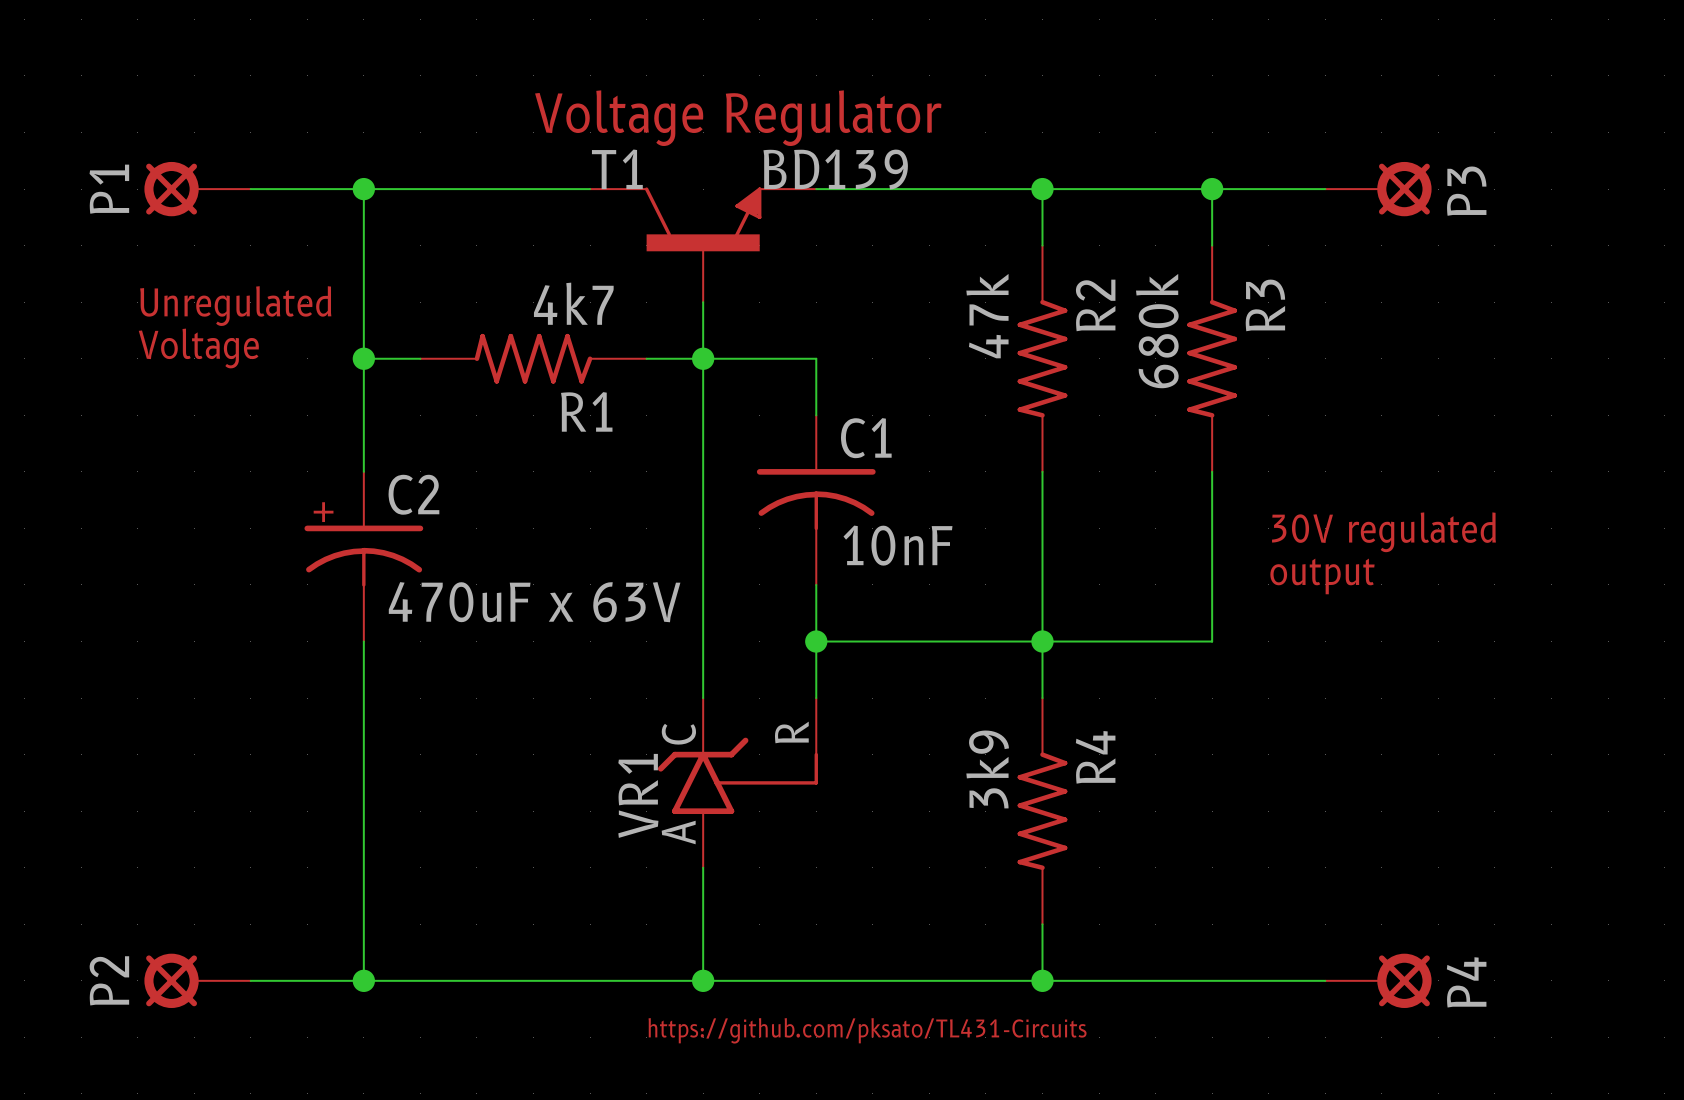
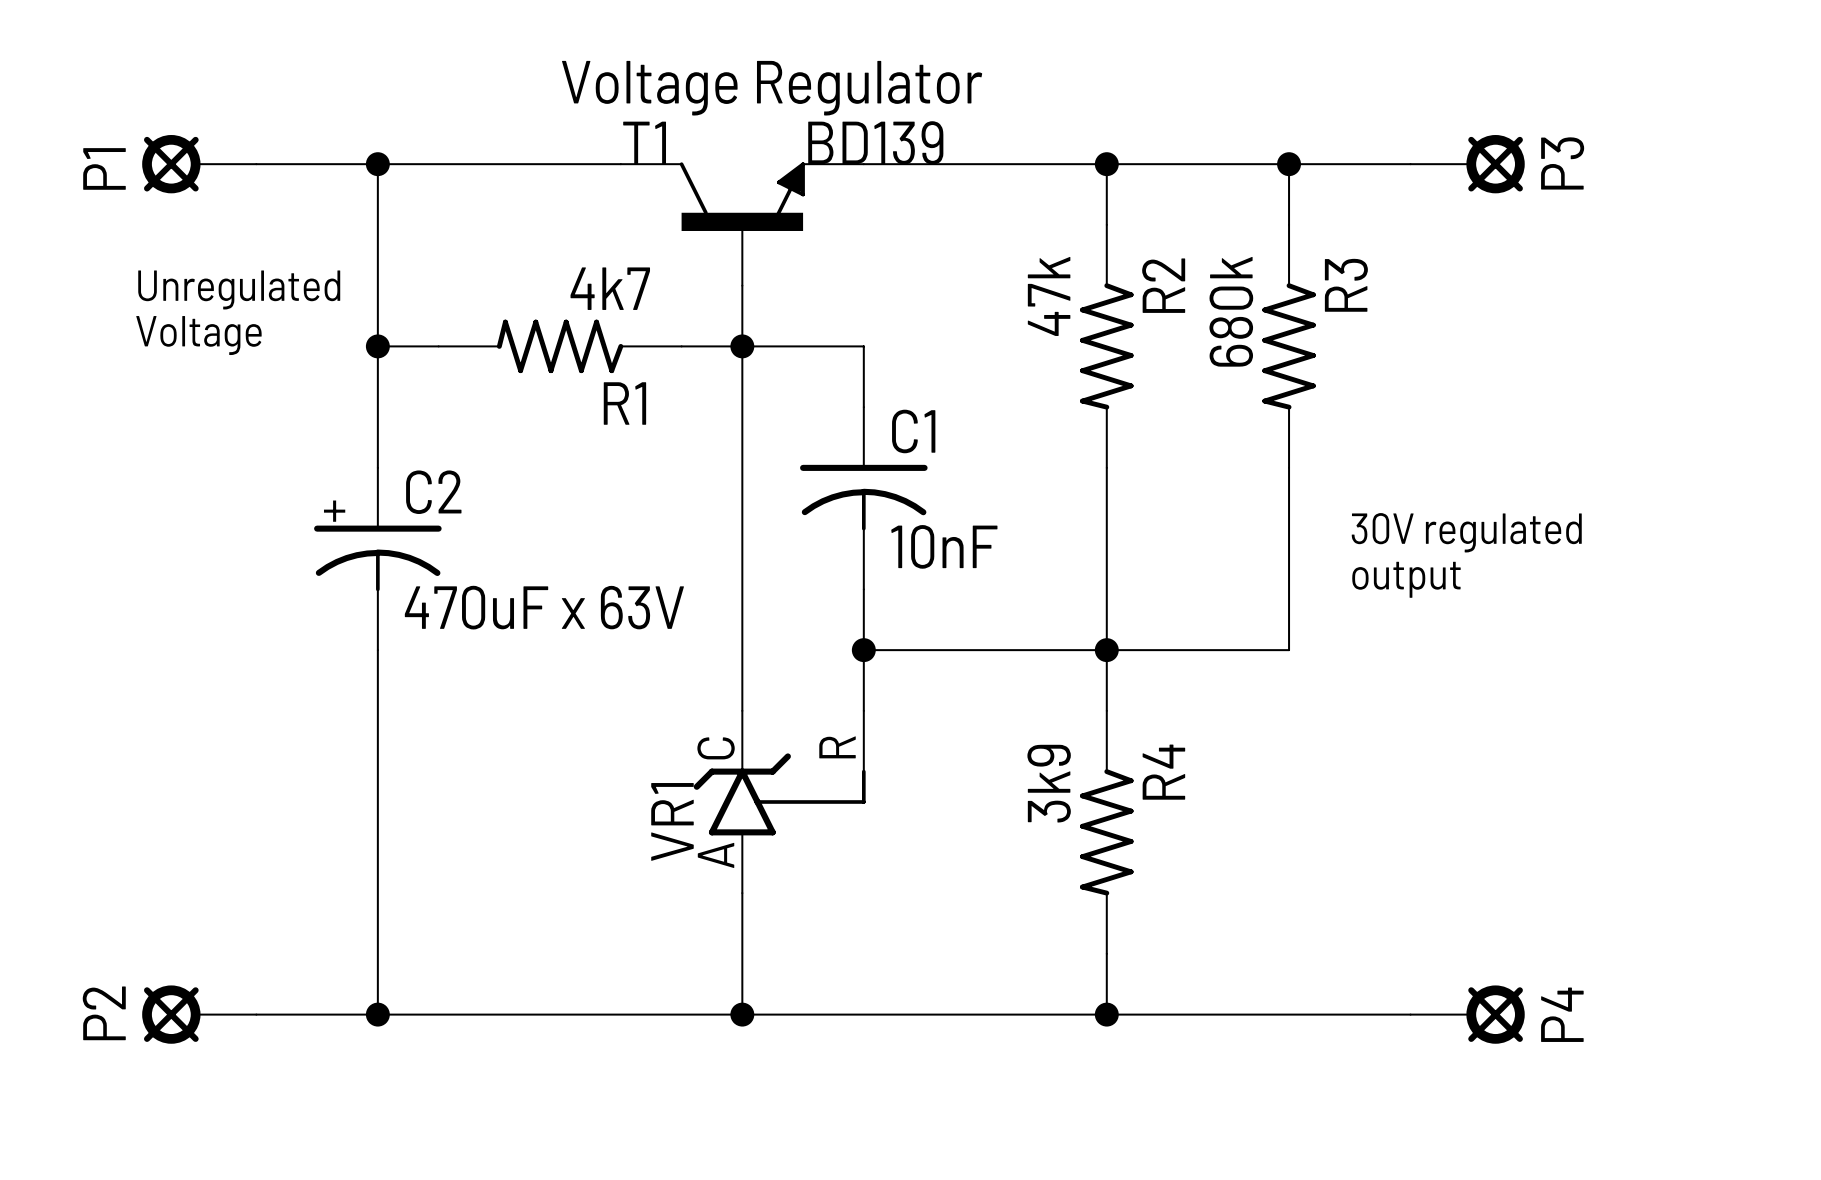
text: https://github.com/pksato/TL431-Circuits (867, 1030) -> none

